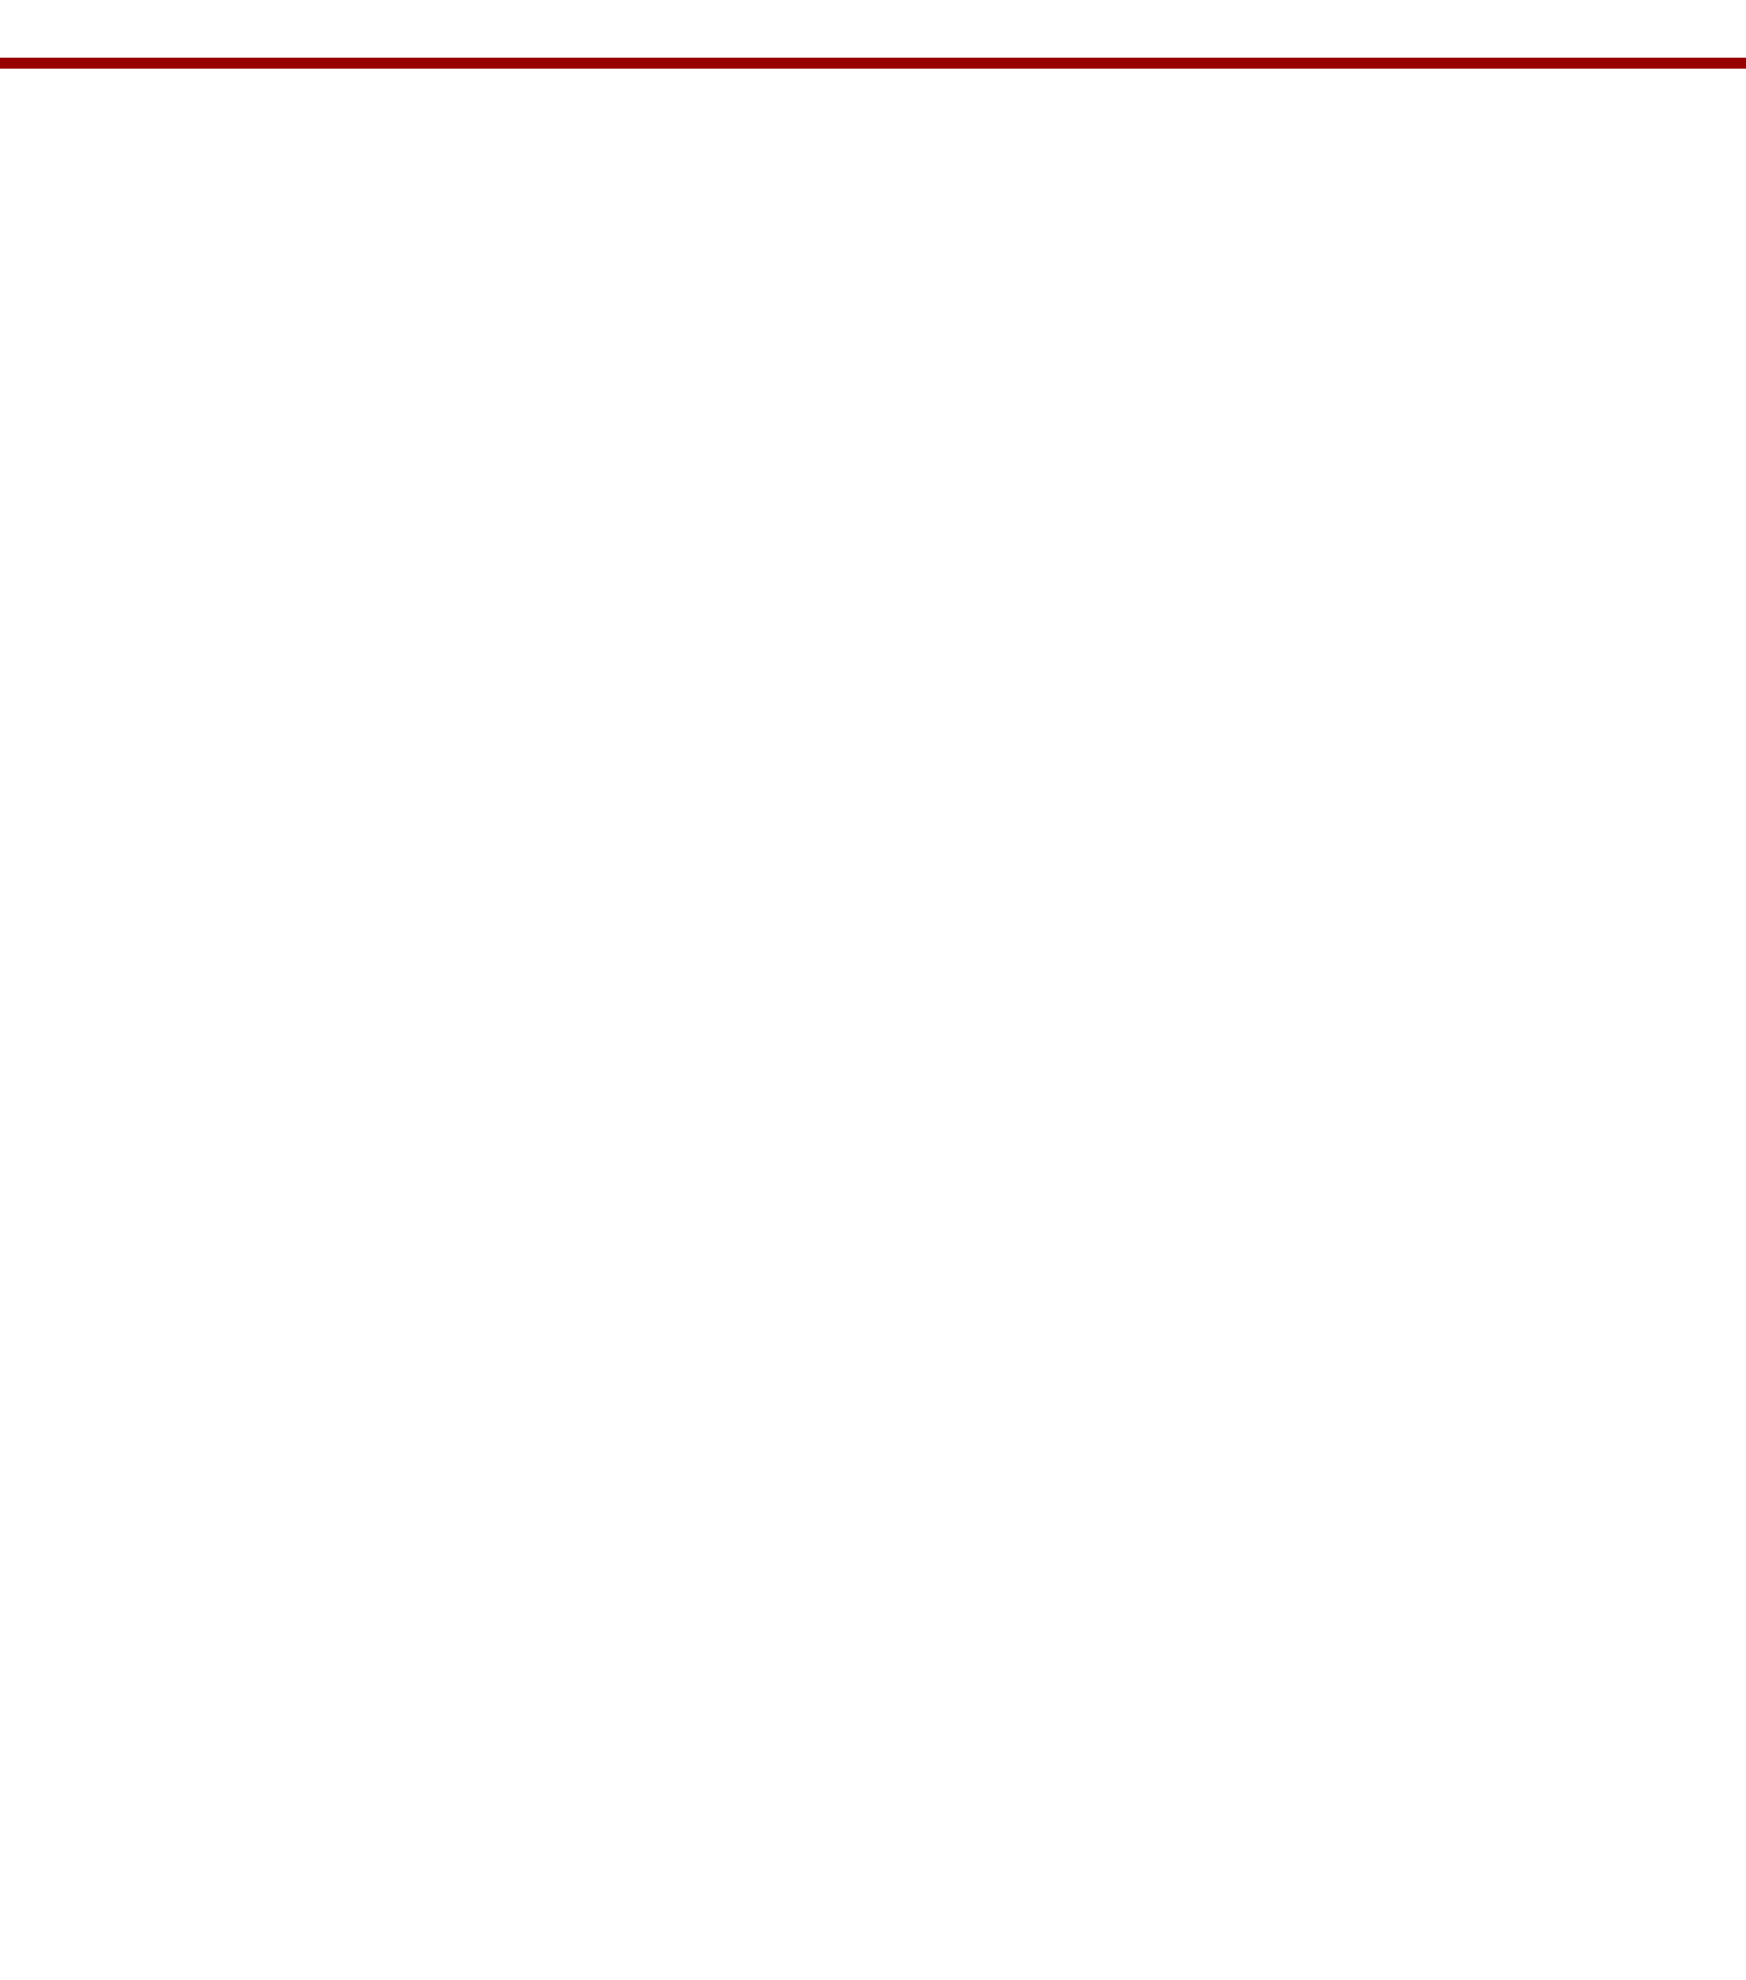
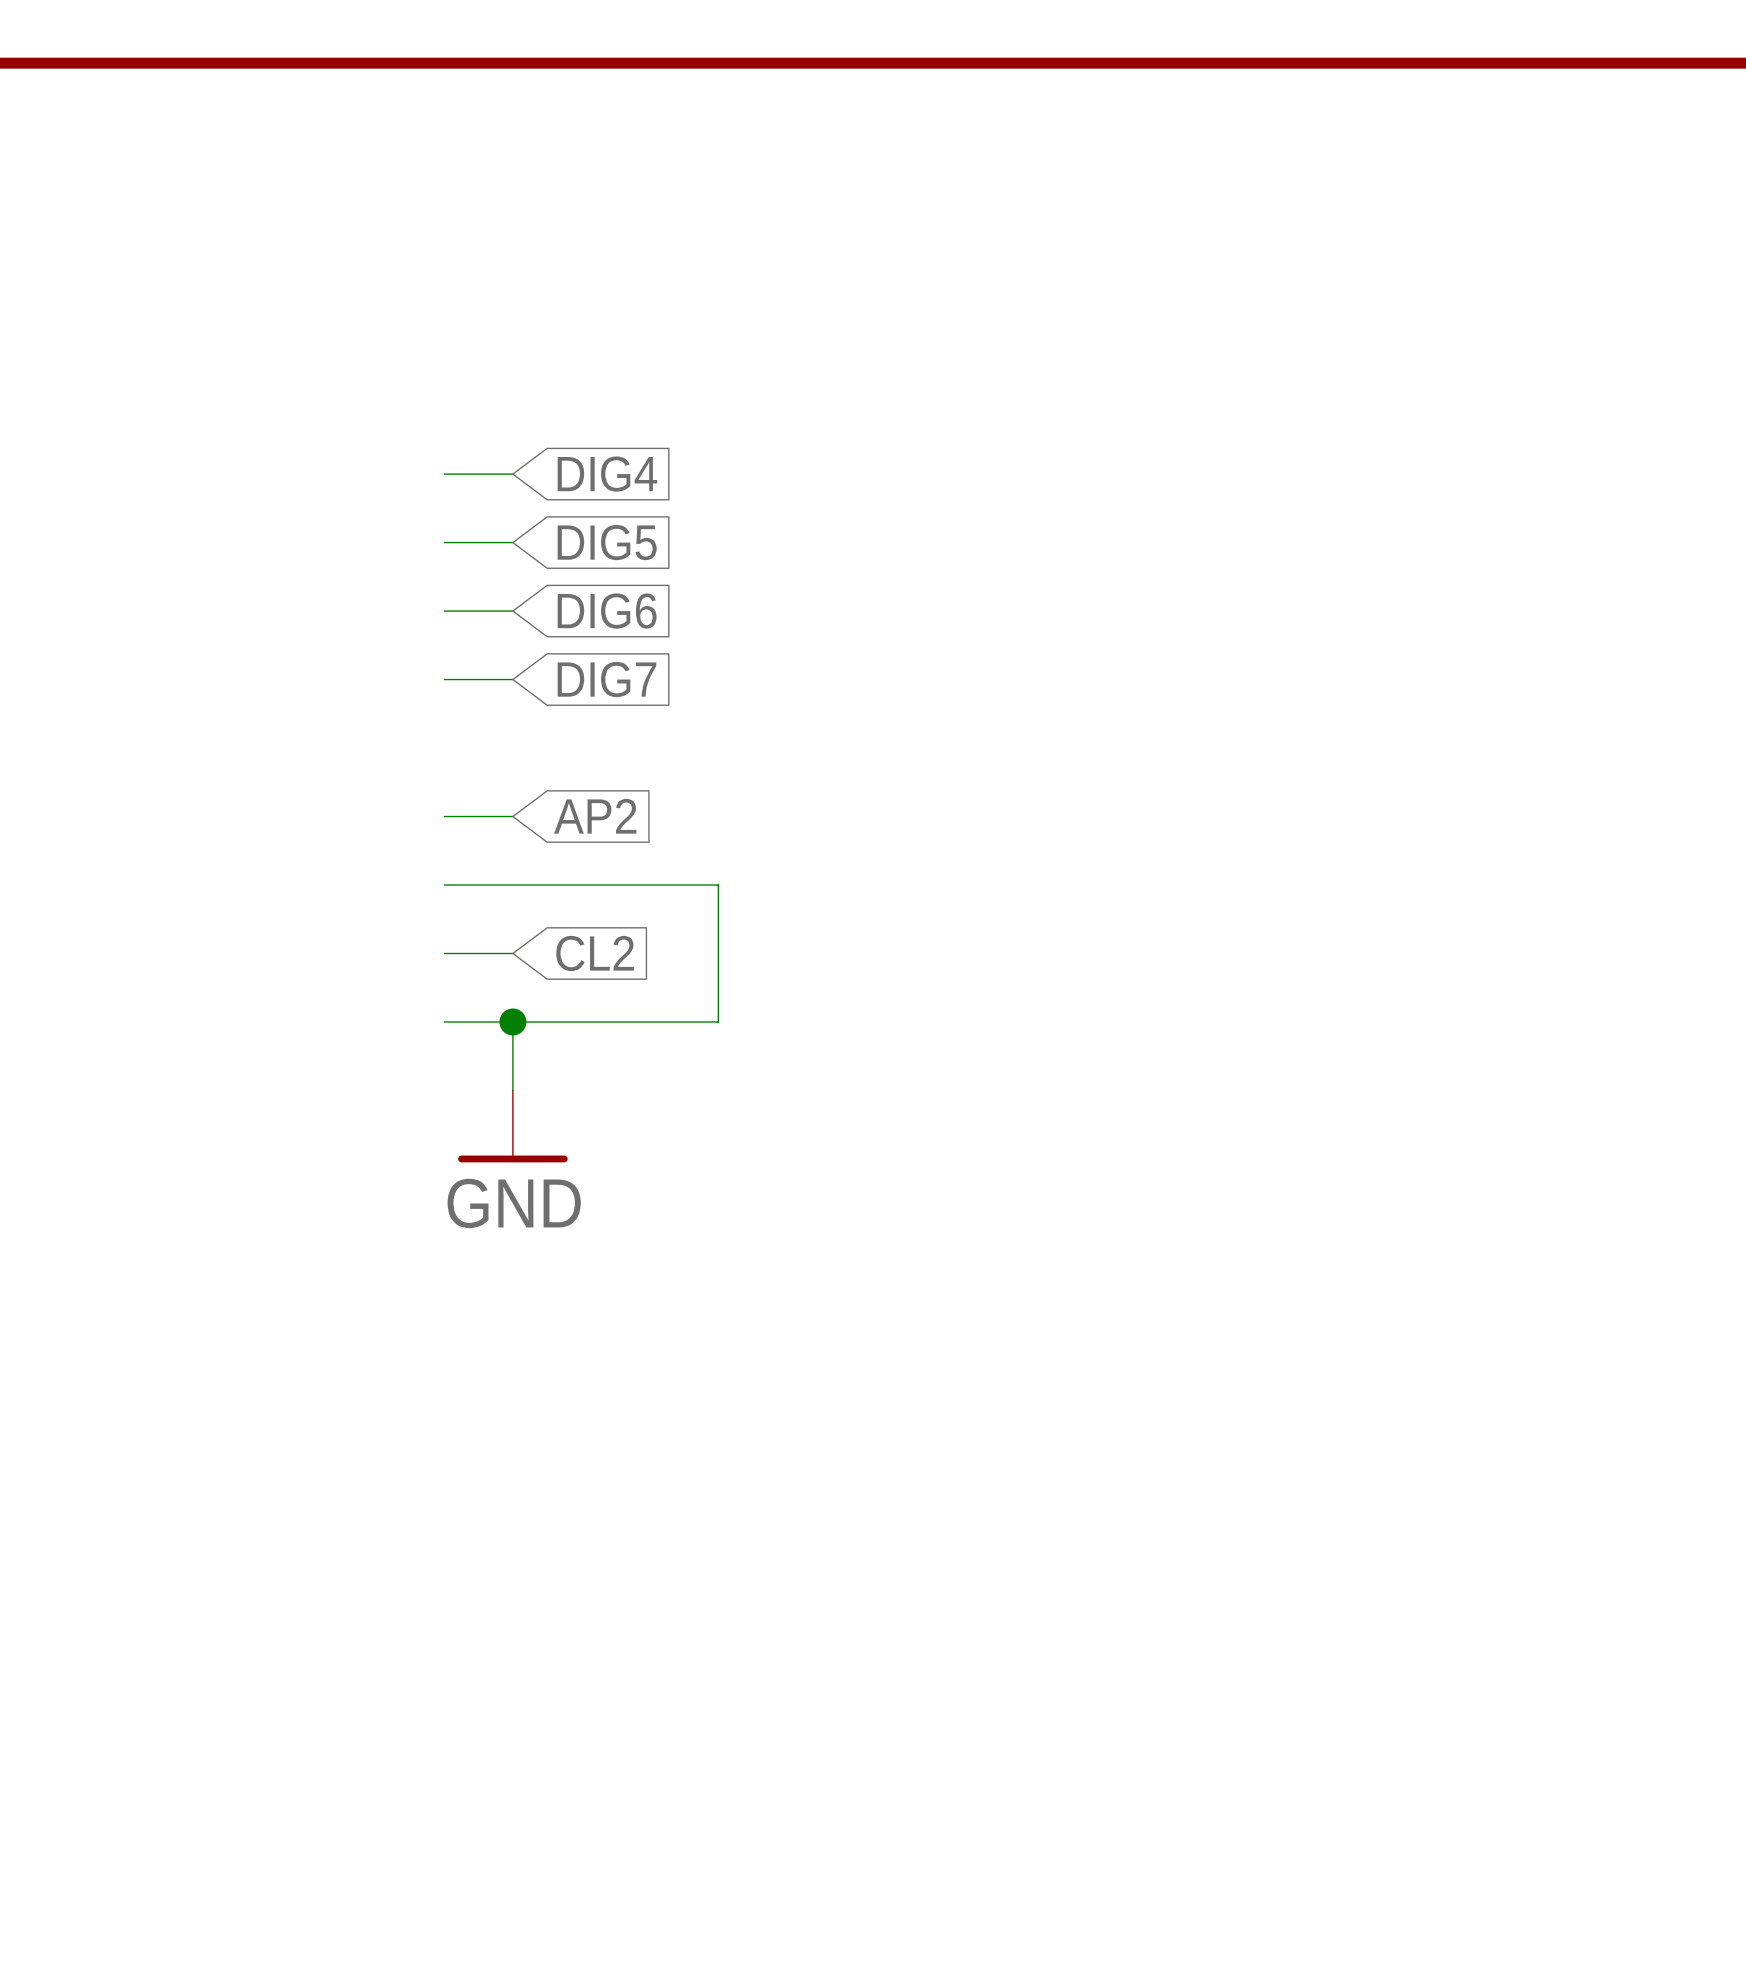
wire: none -> (444, 474) (512, 474)
global label: none -> DIG4 (607, 474)
wire: none -> (444, 542) (512, 542)
global label: none -> DIG5 (607, 542)
wire: none -> (444, 611) (512, 611)
global label: none -> DIG6 (607, 611)
wire: none -> (444, 679) (512, 679)
global label: none -> DIG7 (606, 679)
wire: none -> (444, 816) (512, 816)
global label: none -> AP2 (595, 816)
wire: none -> (444, 885) (718, 885) (718, 1021) (444, 1021)
wire: none -> (444, 953) (512, 953)
global label: none -> CL2 (595, 953)
wire: none -> (512, 1021) (512, 1090)
junction: none -> (512, 1021)
power symbol: none -> GND (512, 1126)

